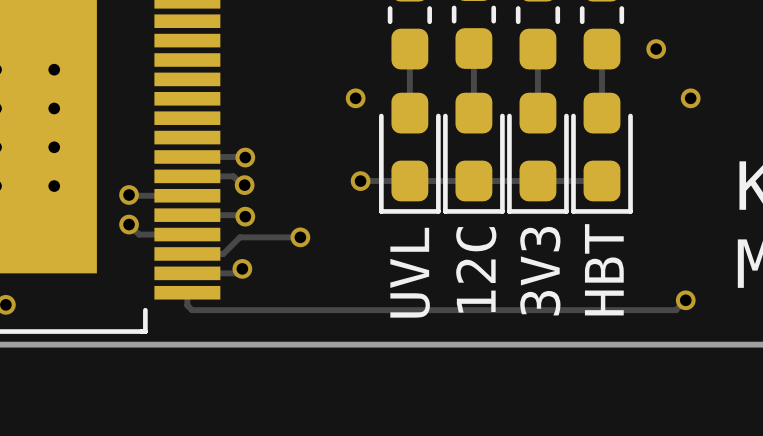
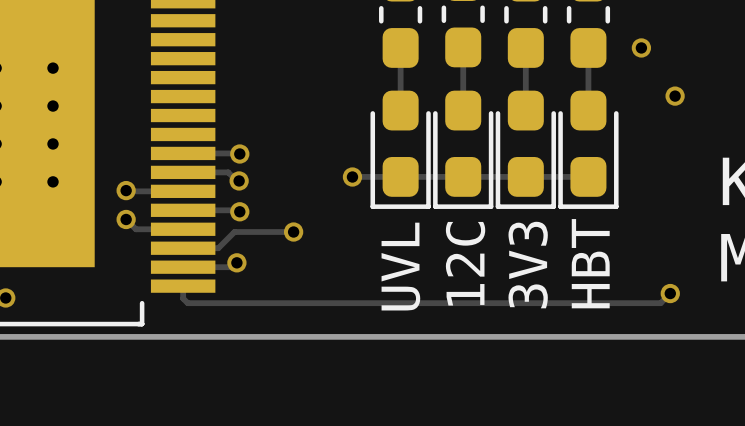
via: (355, 98) -> none

